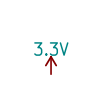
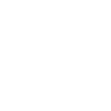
power symbol: 3.3V (51, 65) -> none

